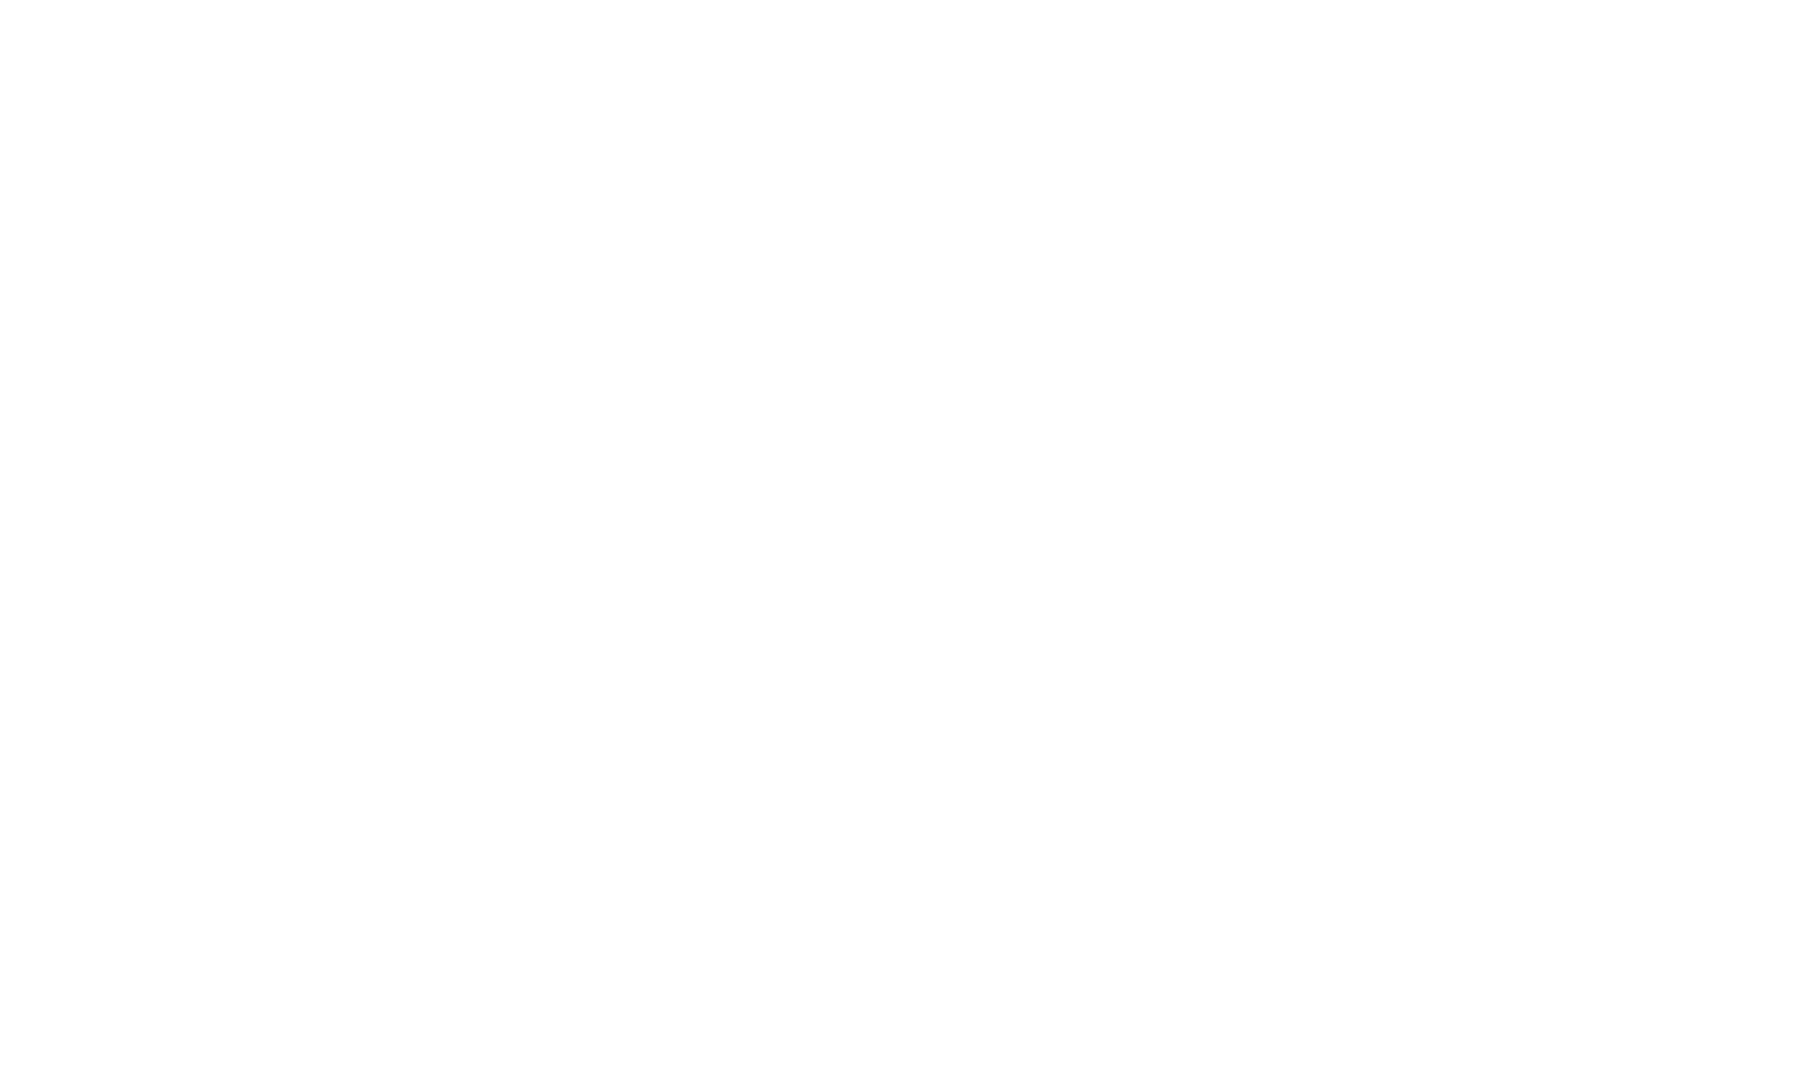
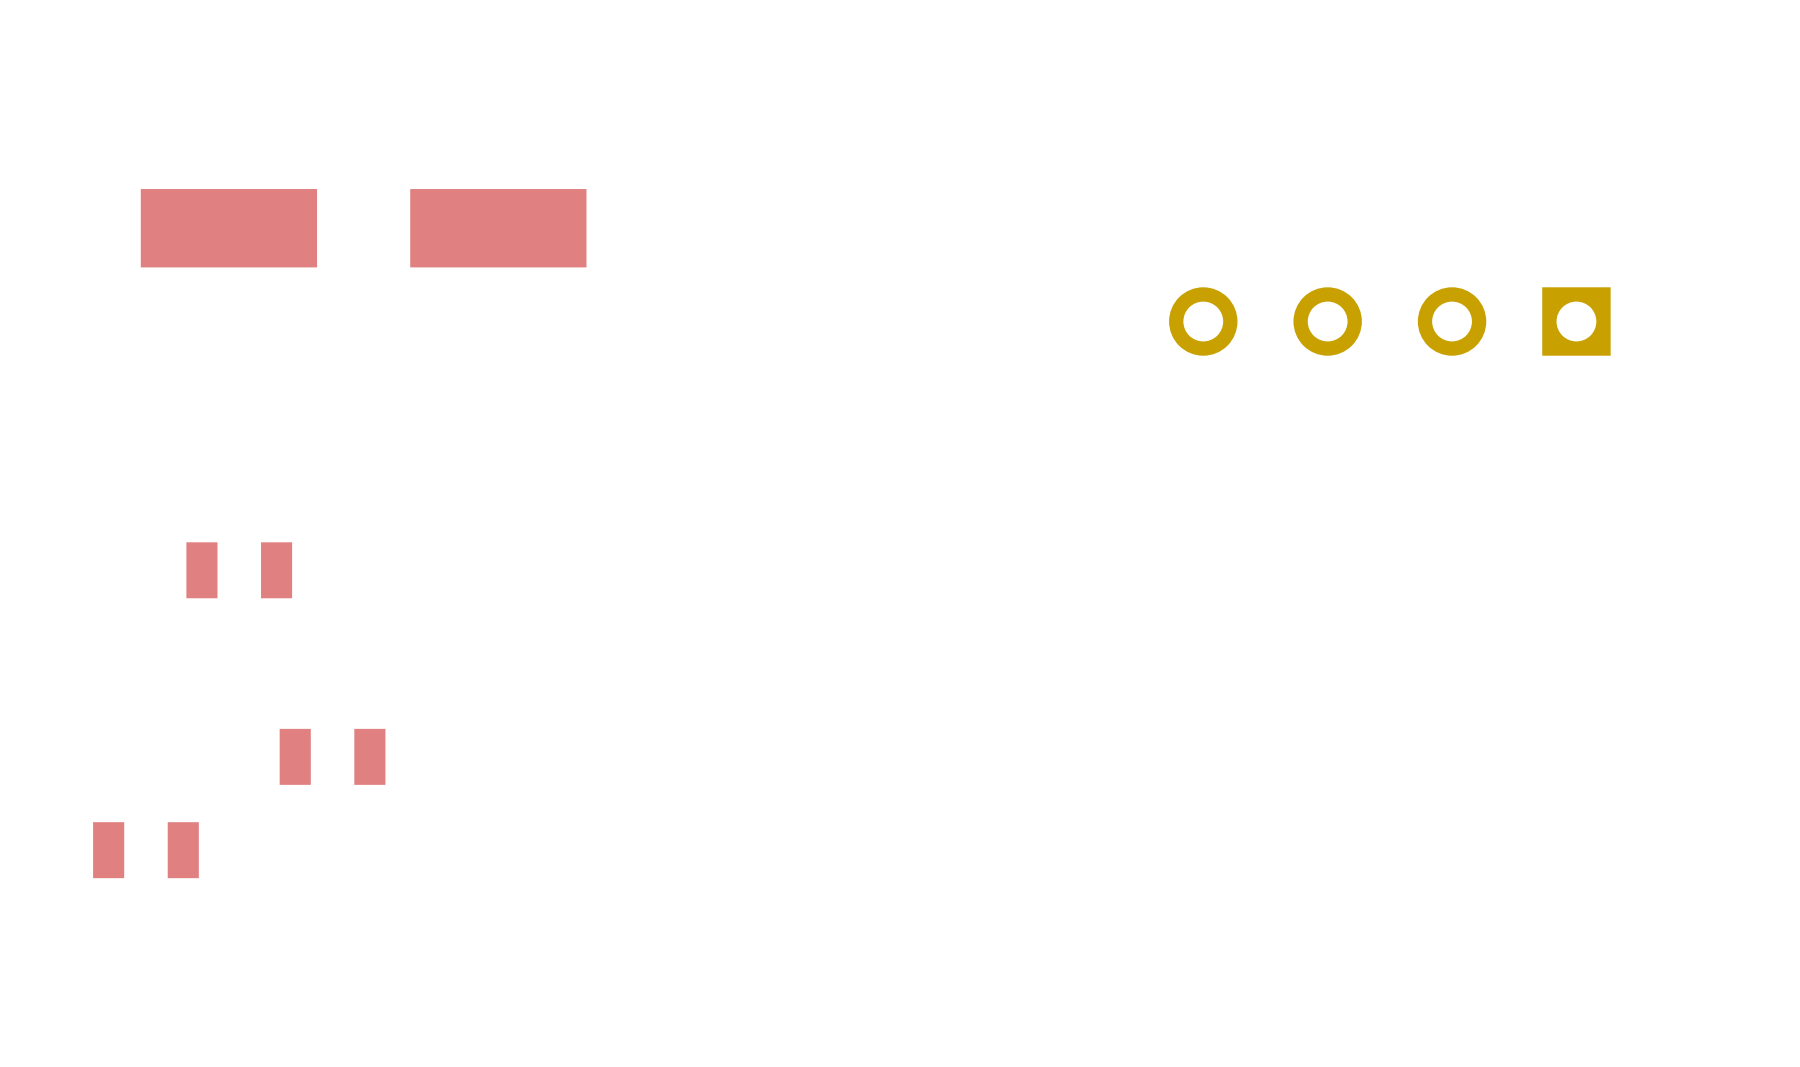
part: none -> (363, 228)
part: none -> (1389, 321)
part: none -> (239, 570)
part: none -> (332, 756)
part: none -> (145, 850)

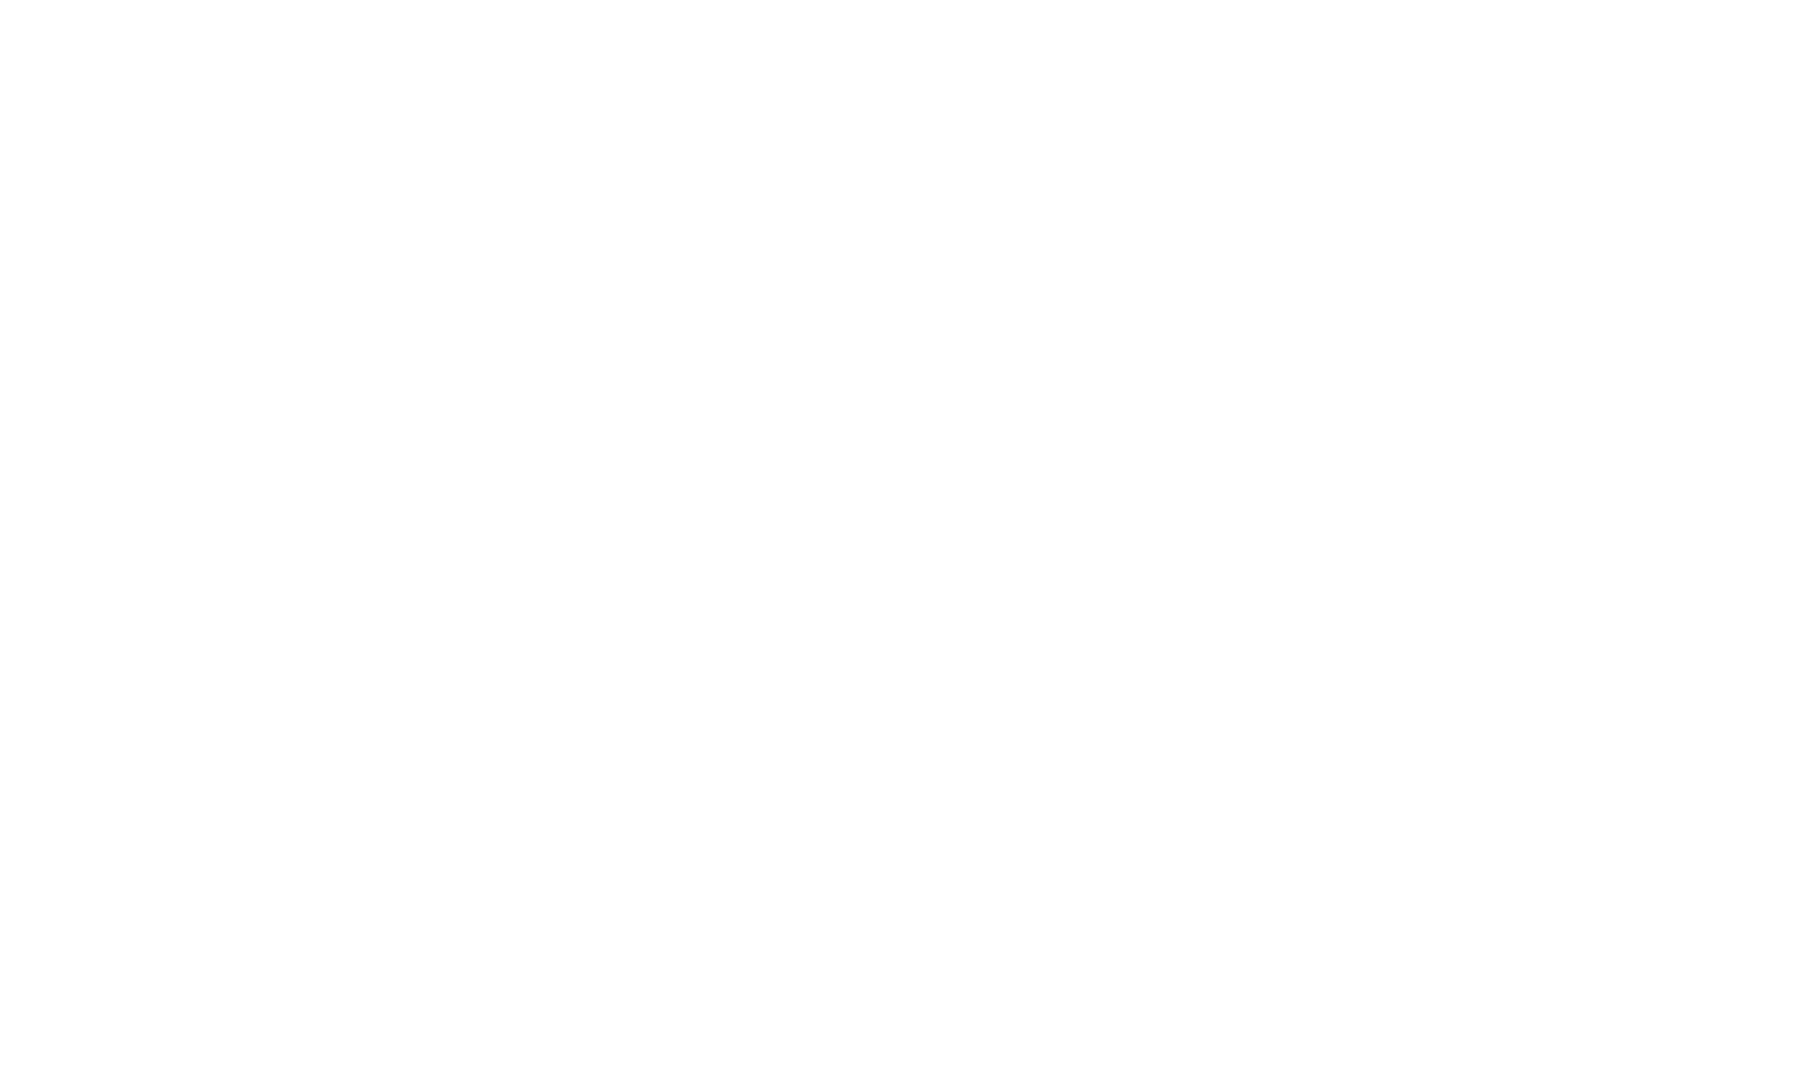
part: (363, 228) -> none
part: (1389, 321) -> none
part: (239, 570) -> none
part: (332, 756) -> none
part: (145, 850) -> none

